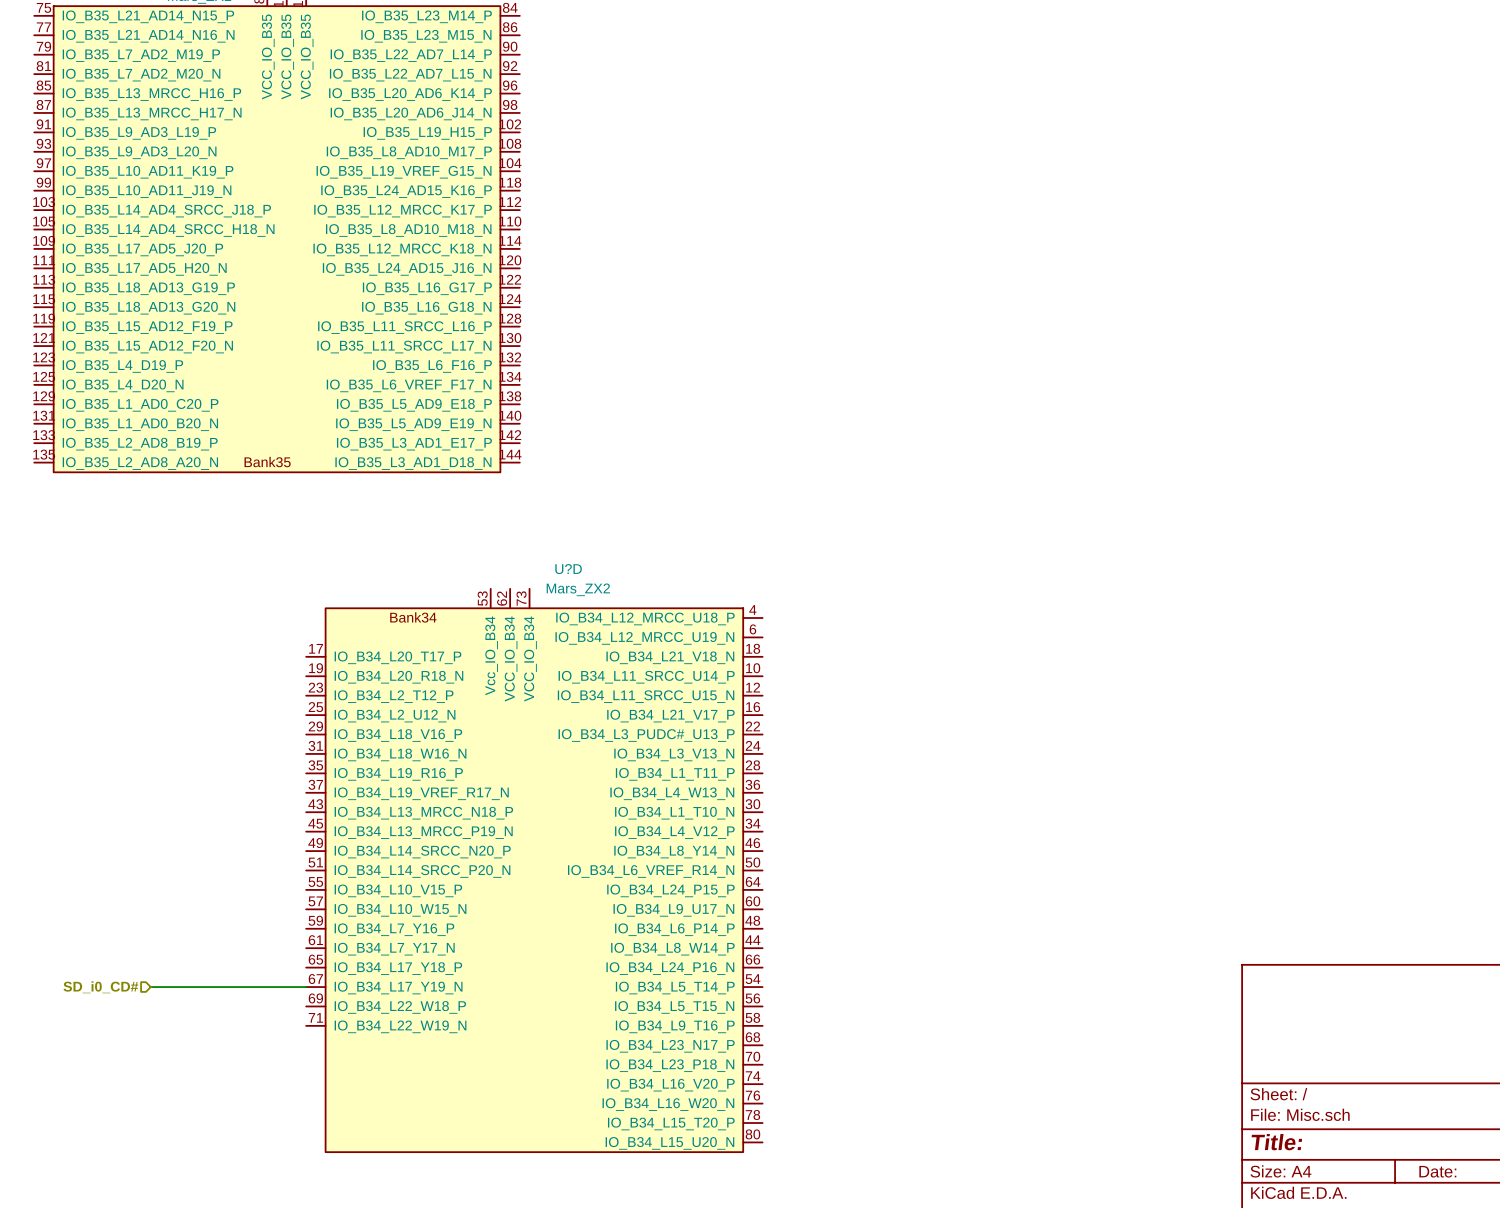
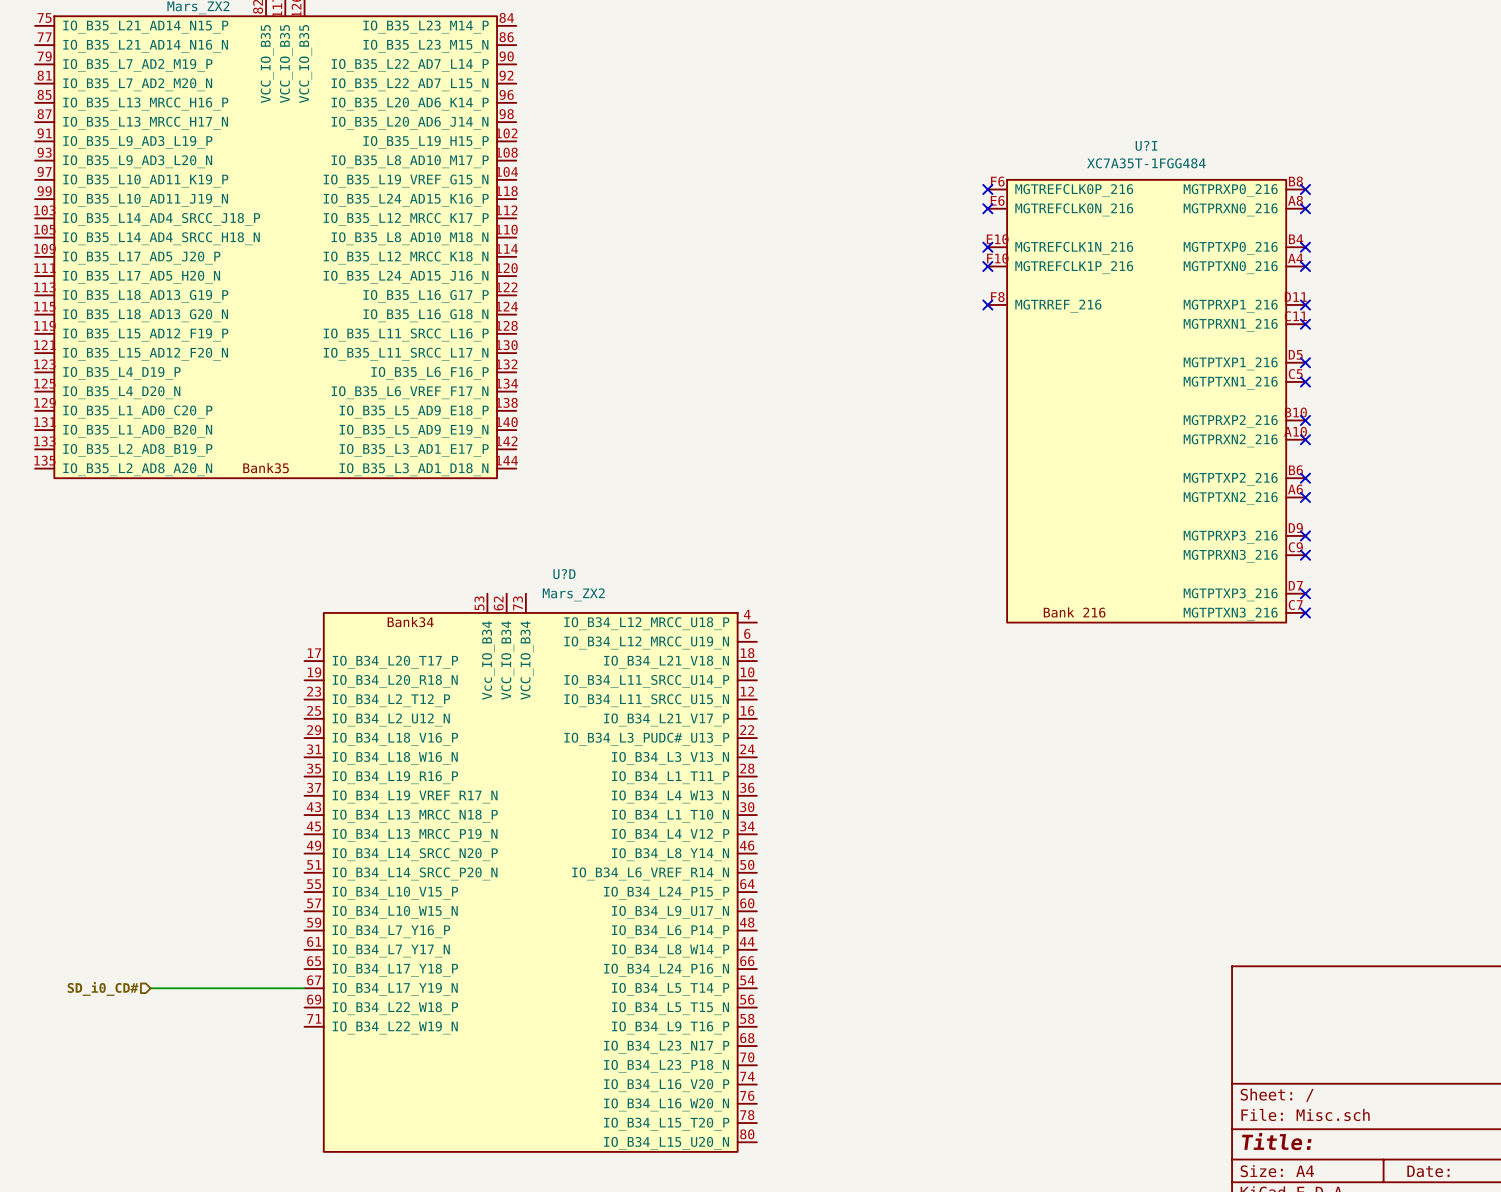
no-connect mark: none -> (987, 189)
no-connect mark: none -> (1305, 189)
no-connect mark: none -> (987, 208)
no-connect mark: none -> (1305, 208)
no-connect mark: none -> (987, 247)
no-connect mark: none -> (1305, 247)
no-connect mark: none -> (987, 266)
no-connect mark: none -> (1305, 266)
no-connect mark: none -> (987, 304)
no-connect mark: none -> (1305, 304)
no-connect mark: none -> (1305, 324)
no-connect mark: none -> (1305, 362)
no-connect mark: none -> (1305, 381)
U?I: none -> XC7A35T-1FGG484 (1146, 401)
no-connect mark: none -> (1305, 420)
no-connect mark: none -> (1305, 439)
no-connect mark: none -> (1305, 478)
no-connect mark: none -> (1305, 497)
no-connect mark: none -> (1305, 535)
no-connect mark: none -> (1305, 555)
no-connect mark: none -> (1305, 593)
no-connect mark: none -> (1305, 612)

